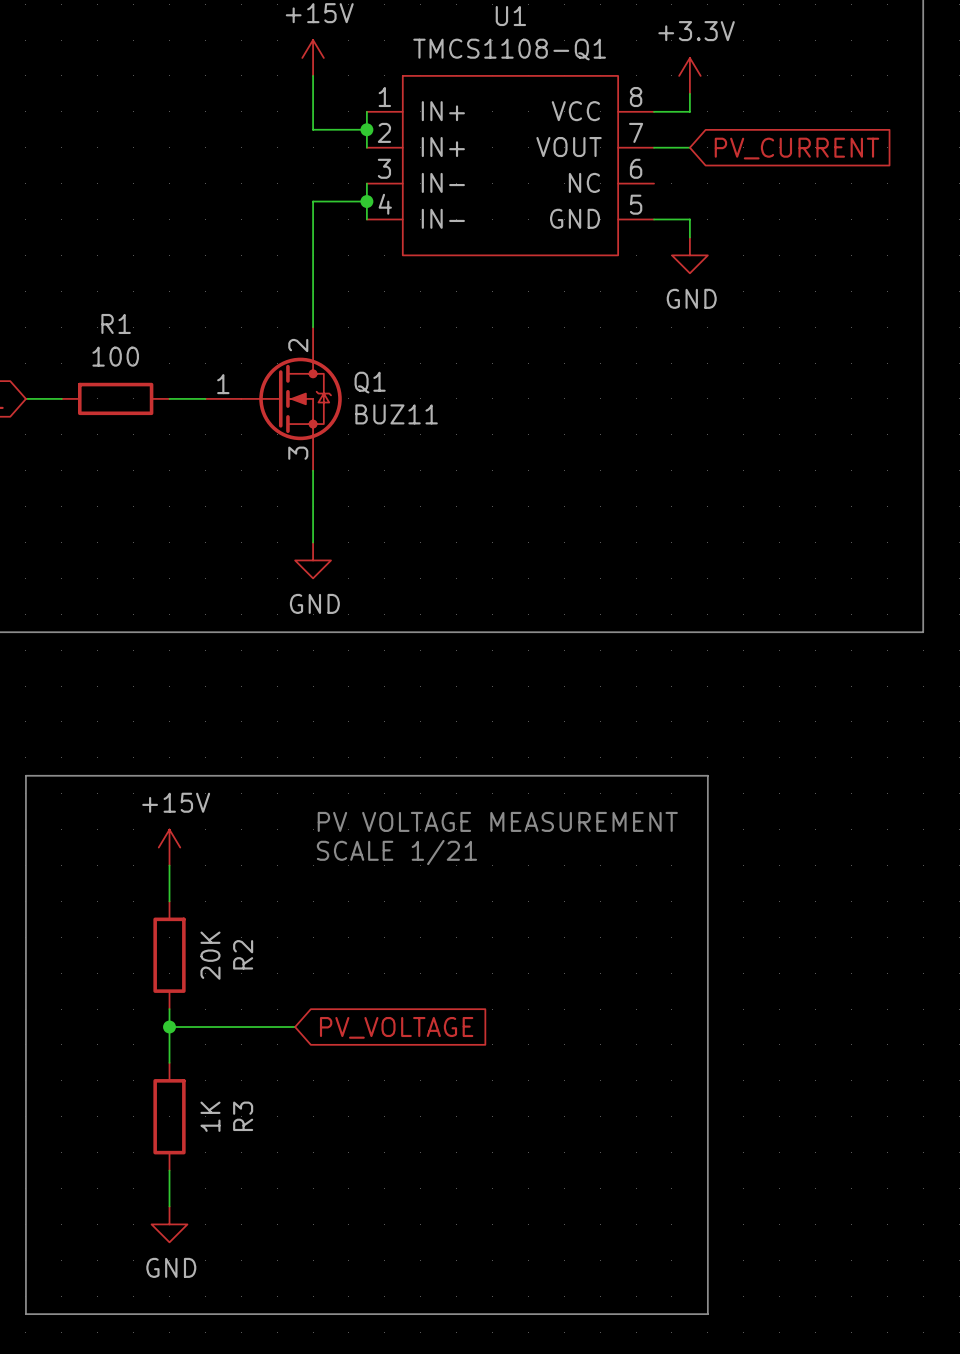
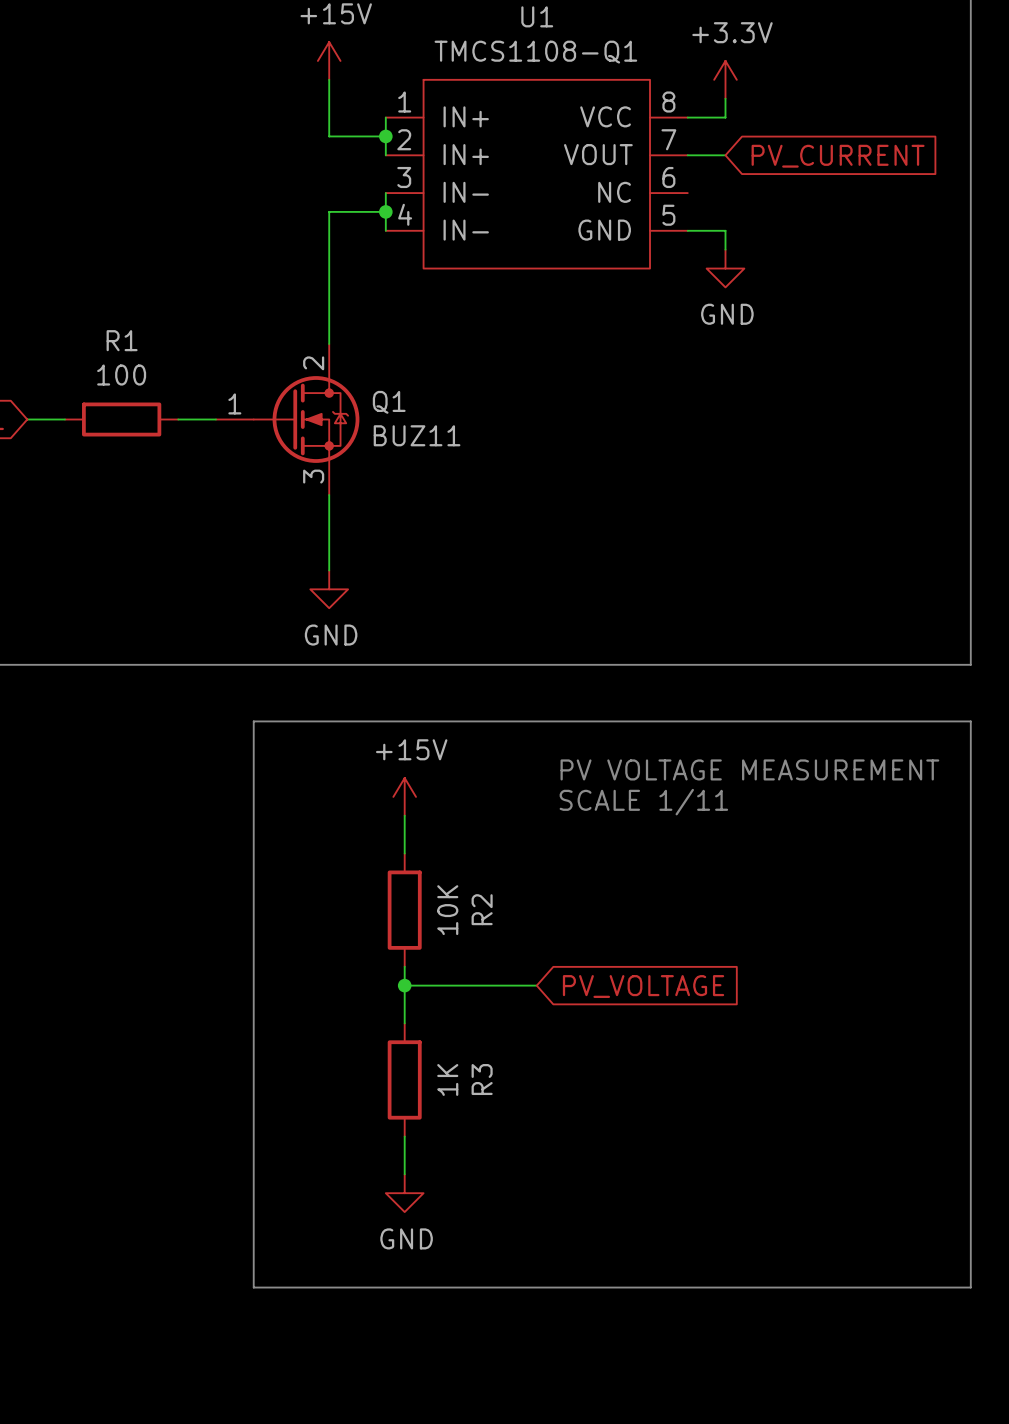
text: none -> SCALE 1/11 (643, 802)
line: (25, 775) (25, 1314) (707, 1314) (707, 775) (25, 775) -> (253, 721) (253, 1287) (970, 1287) (970, 721) (253, 721)
text position: PV VOLTAGE MEASUREMENT (497, 821) -> PV VOLTAGE MEASUREMENT (749, 769)
power symbol position: +15V (169, 847) -> +15V (404, 796)
text: SCALE 1/21 (396, 852) -> none
wire: (169, 865) (169, 901) -> (404, 815) (404, 853)
junction: none -> (404, 985)
R2 position: (169, 955) -> (404, 910)
R2 value: 20K (210, 955) -> 10K (447, 910)
wire: (169, 1009) (169, 1062) -> (404, 966) (404, 1023)
wire: (169, 1027) (295, 1027) -> (404, 985) (536, 985)
junction: (169, 1027) -> none
global label position: PV_VOLTAGE (396, 1027) -> PV_VOLTAGE (643, 986)
R3 position: (169, 1116) -> (404, 1079)
wire: (169, 1170) (169, 1206) -> (404, 1136) (404, 1174)
power symbol position: GND (169, 1224) -> GND (404, 1193)

